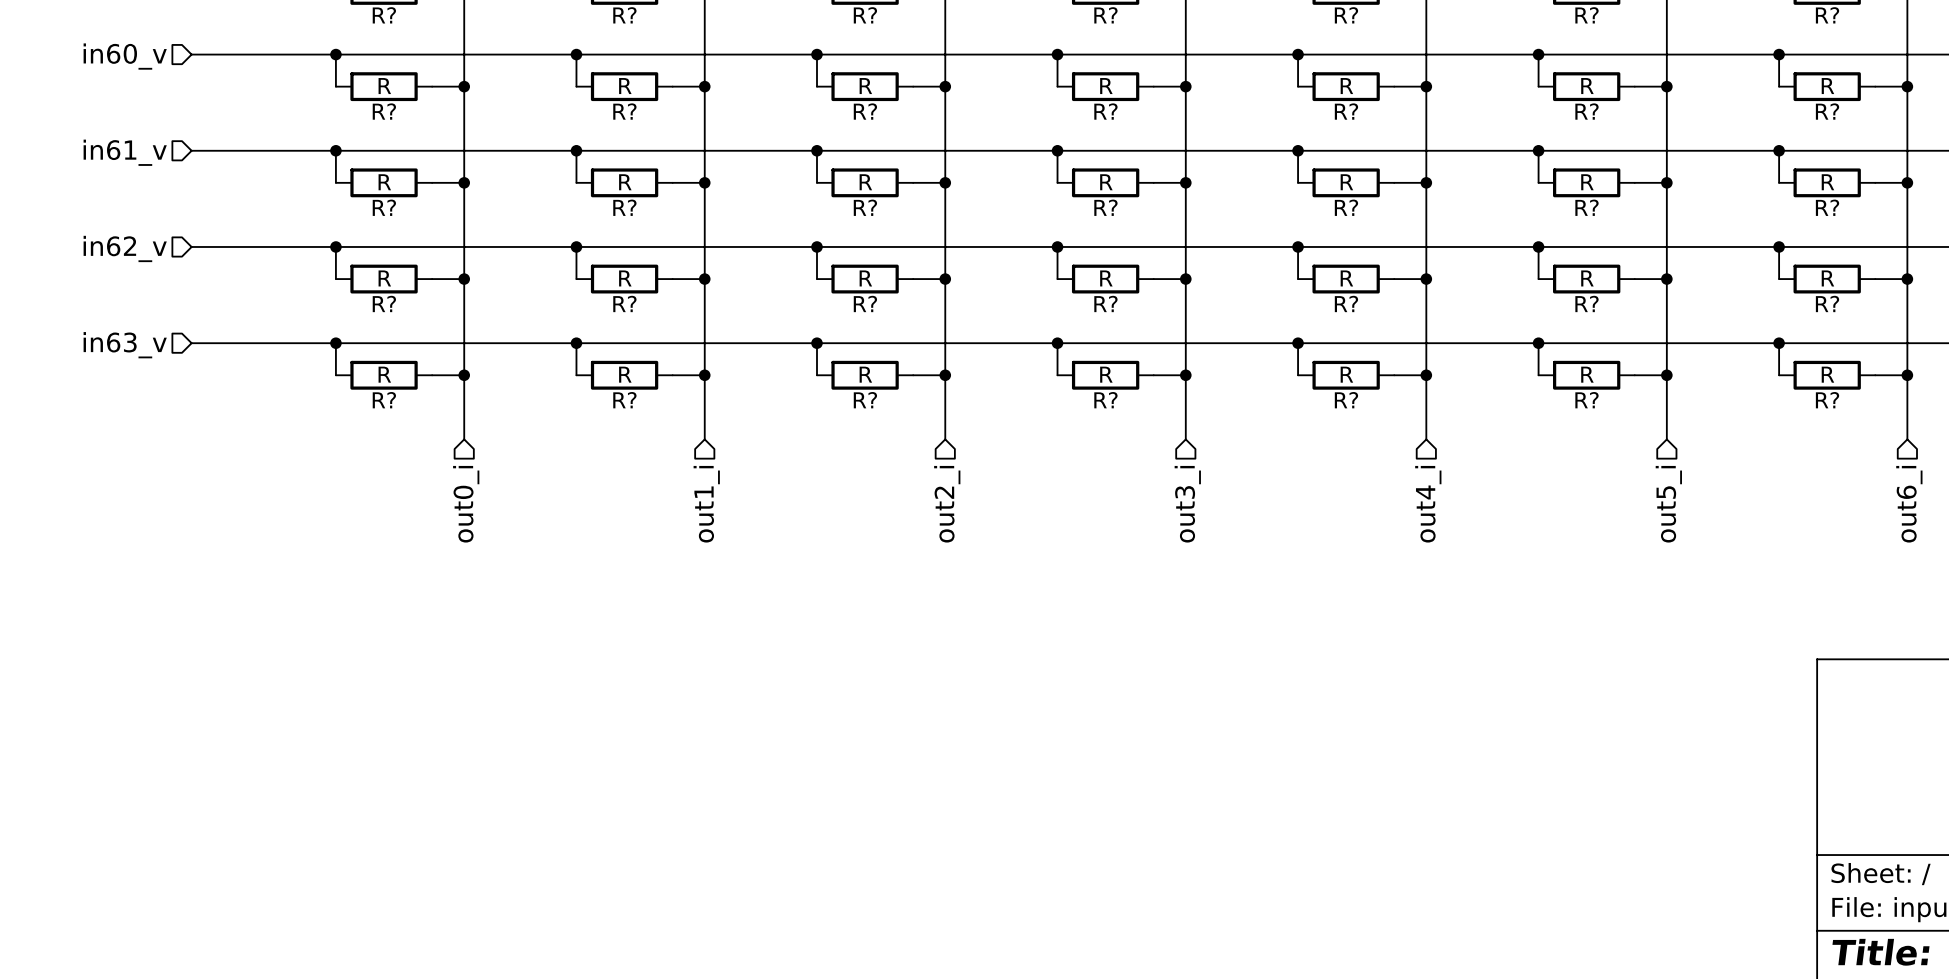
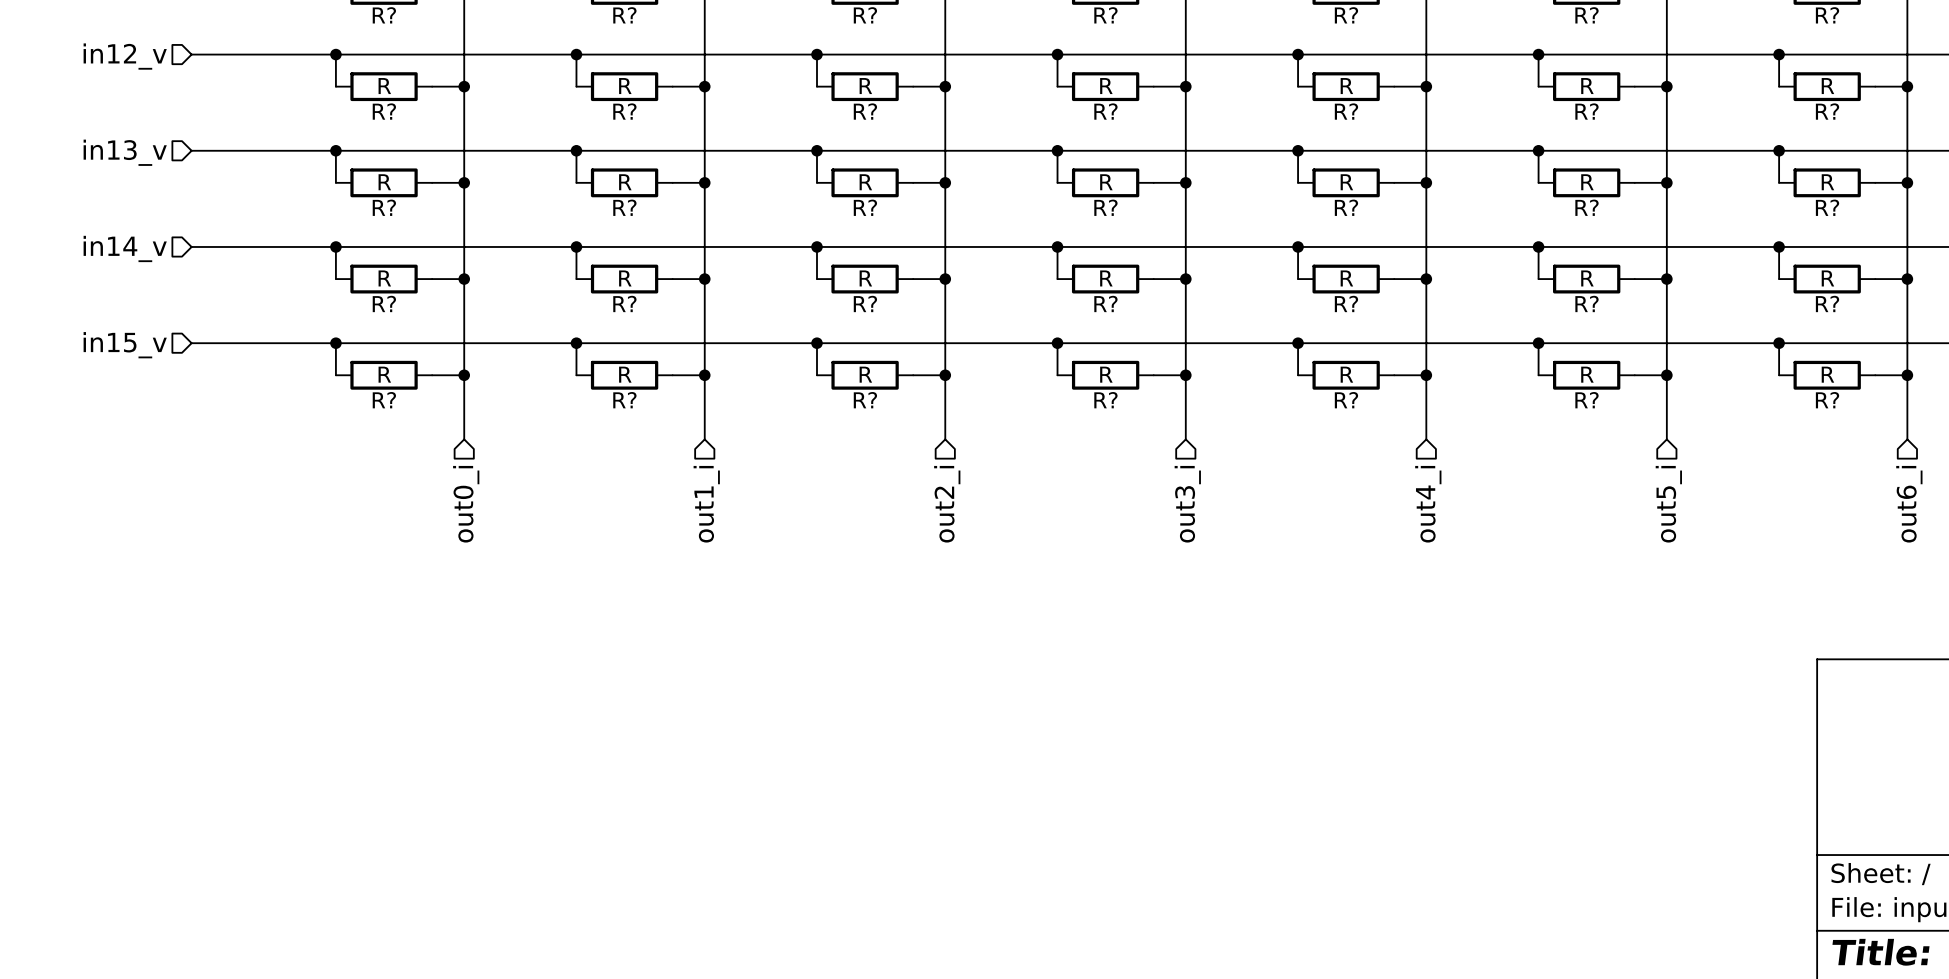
hierarchical label: in60_v (125, 56) -> in12_v (125, 56)
hierarchical label: in61_v (125, 152) -> in13_v (125, 152)
hierarchical label: in62_v (125, 248) -> in14_v (125, 248)
hierarchical label: in63_v (125, 345) -> in15_v (125, 345)

